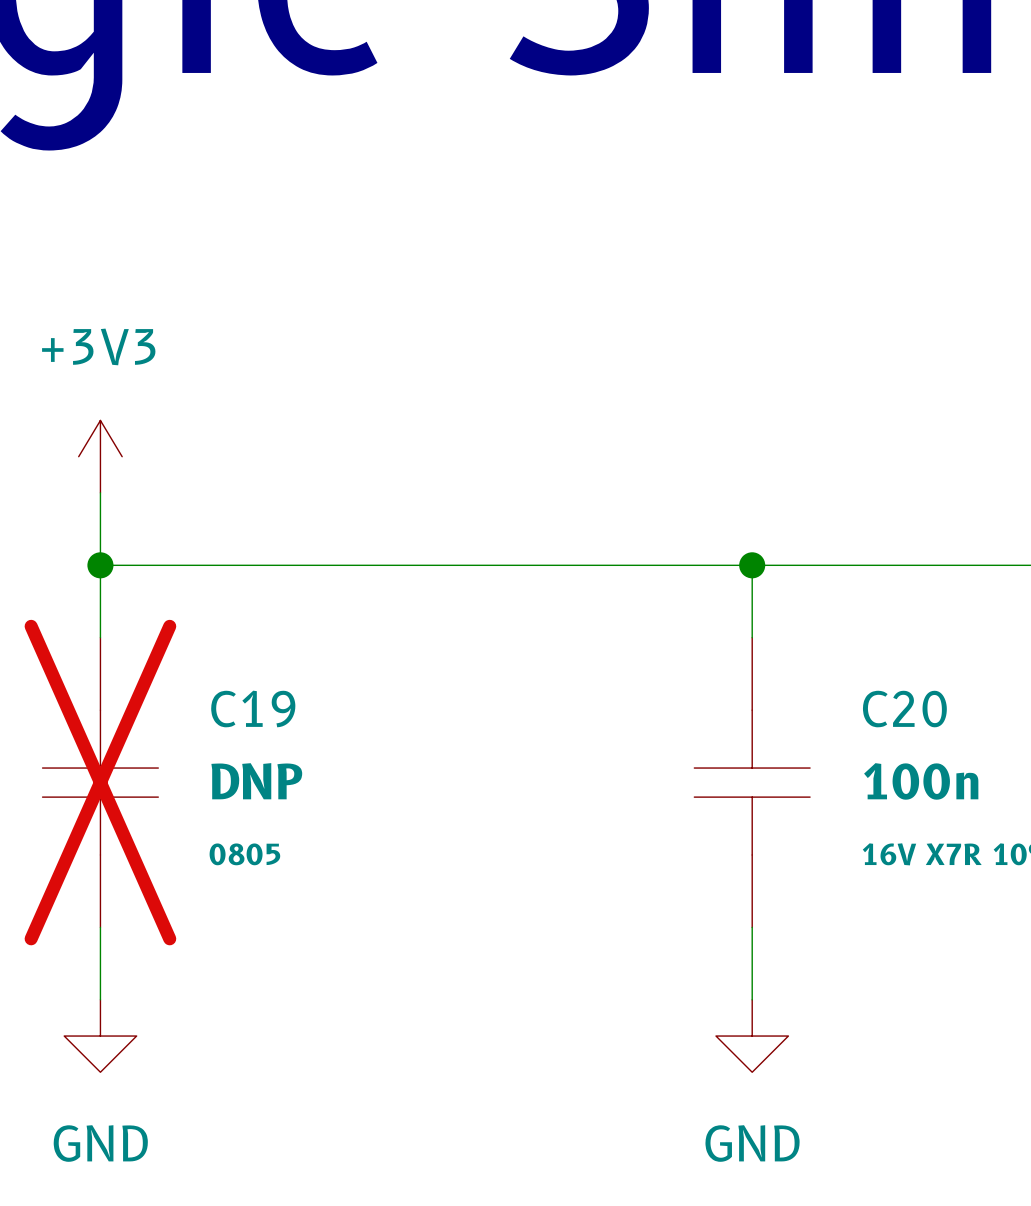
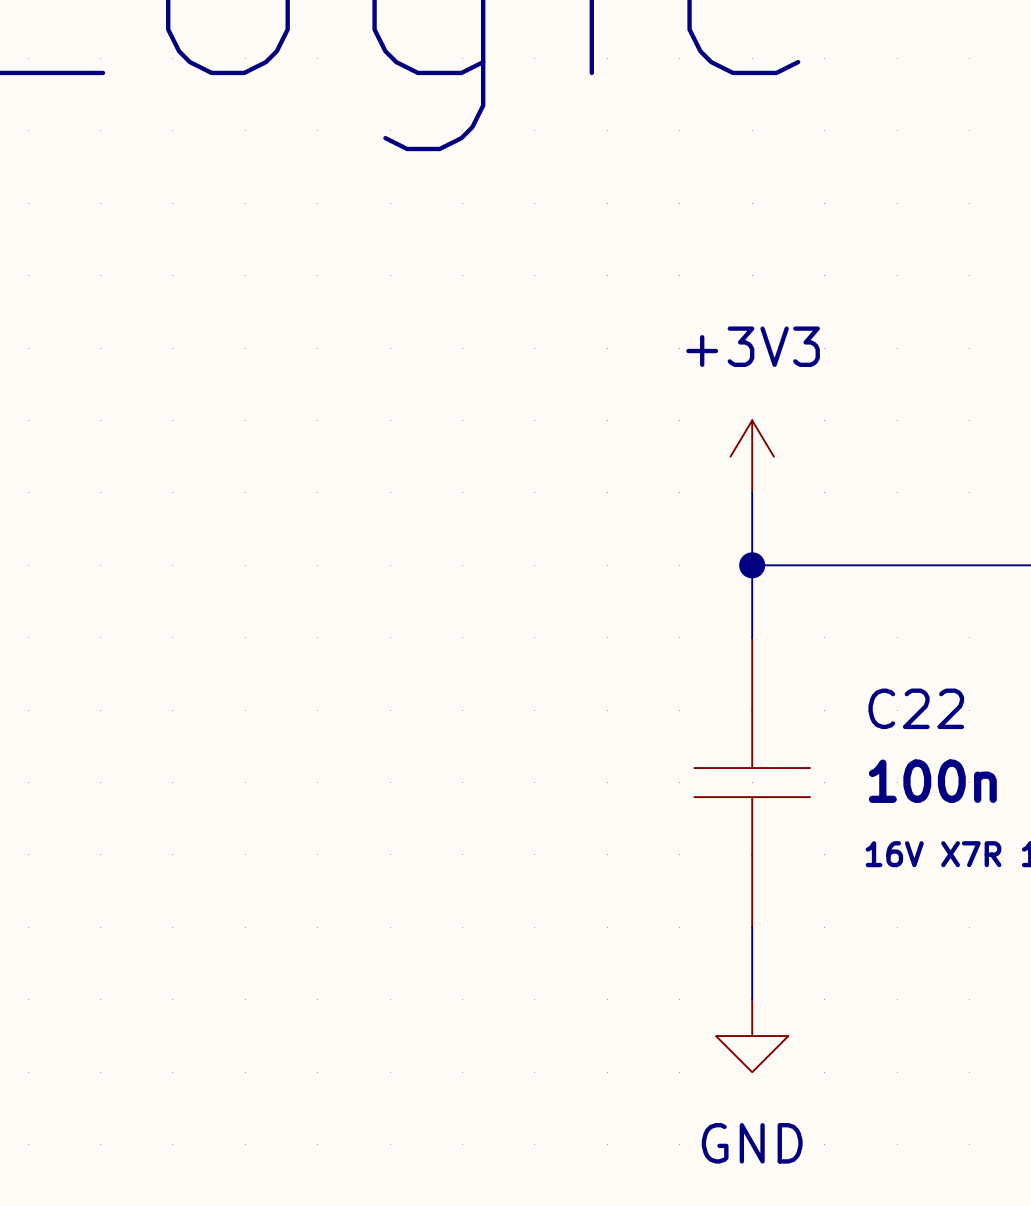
power symbol position: +3V3 (100, 456) -> +3V3 (752, 456)
wire: (100, 492) (100, 637) -> none
wire: (100, 565) (752, 565) -> (752, 492) (752, 565)
junction: (100, 565) -> none
C20 name: C20 (904, 709) -> C22 (916, 708)
C19: DNP (100, 782) -> none
wire: (100, 927) (100, 999) -> none
power symbol: GND (100, 1036) -> none

